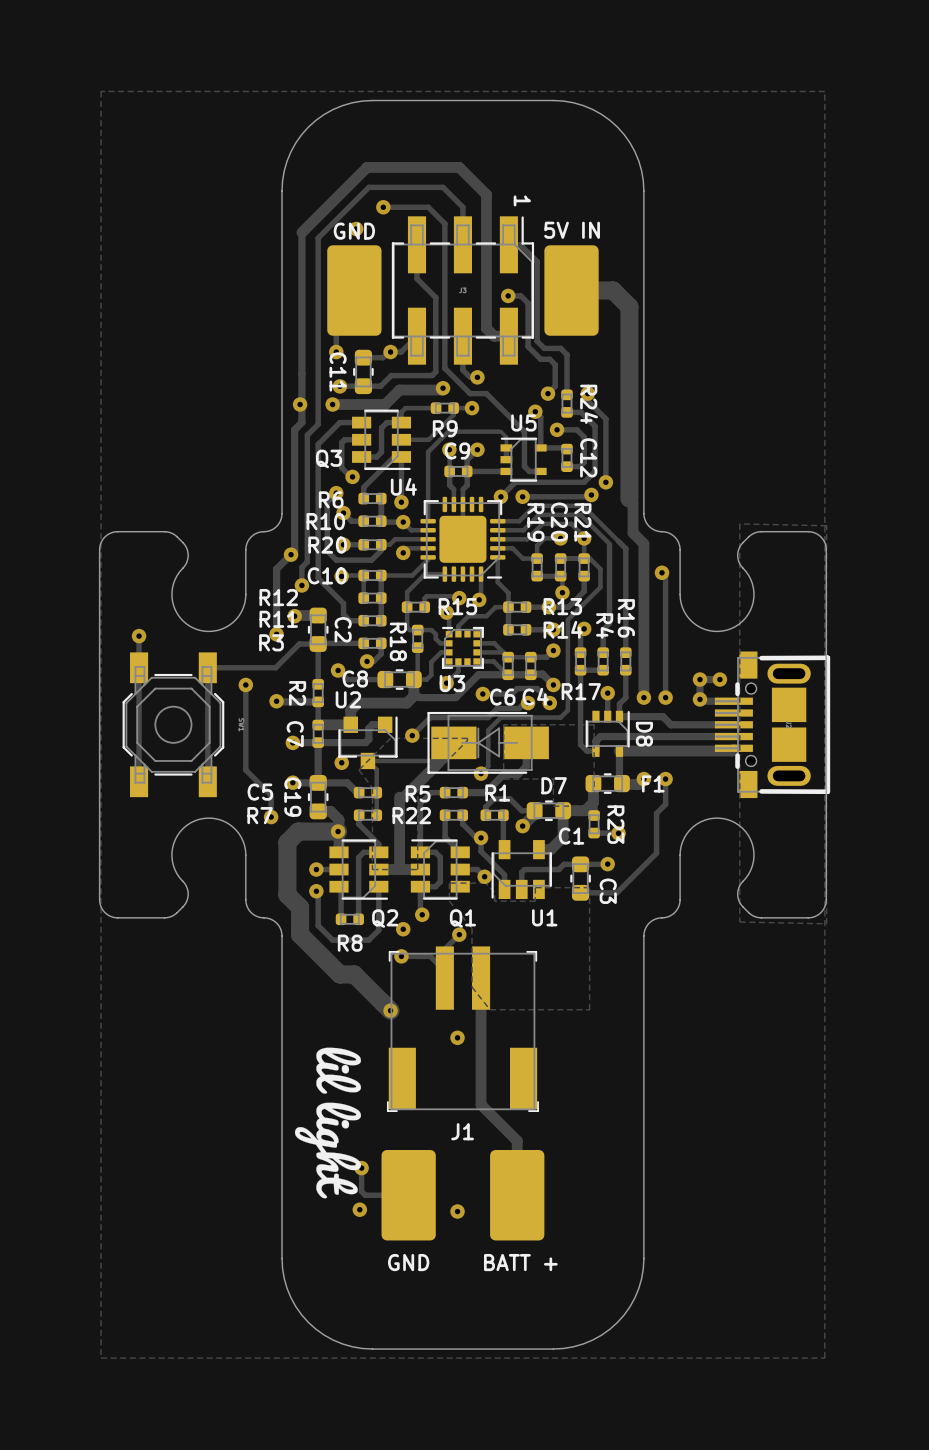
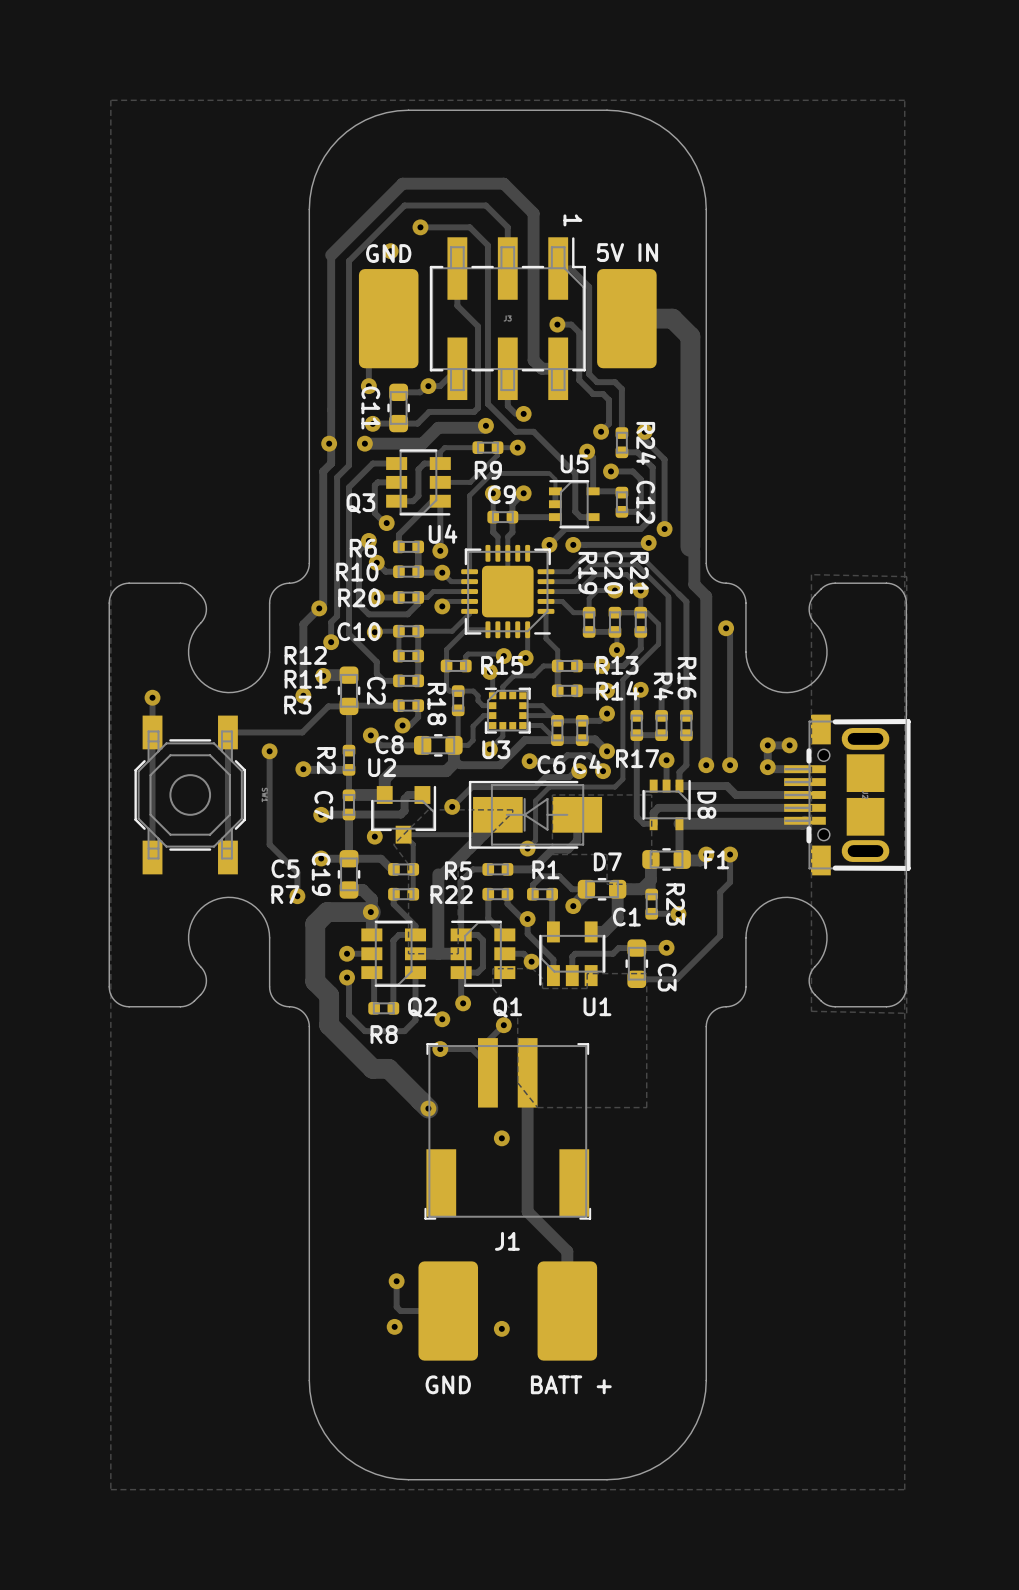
drawing: [294, 1047, 362, 1199] -> none

